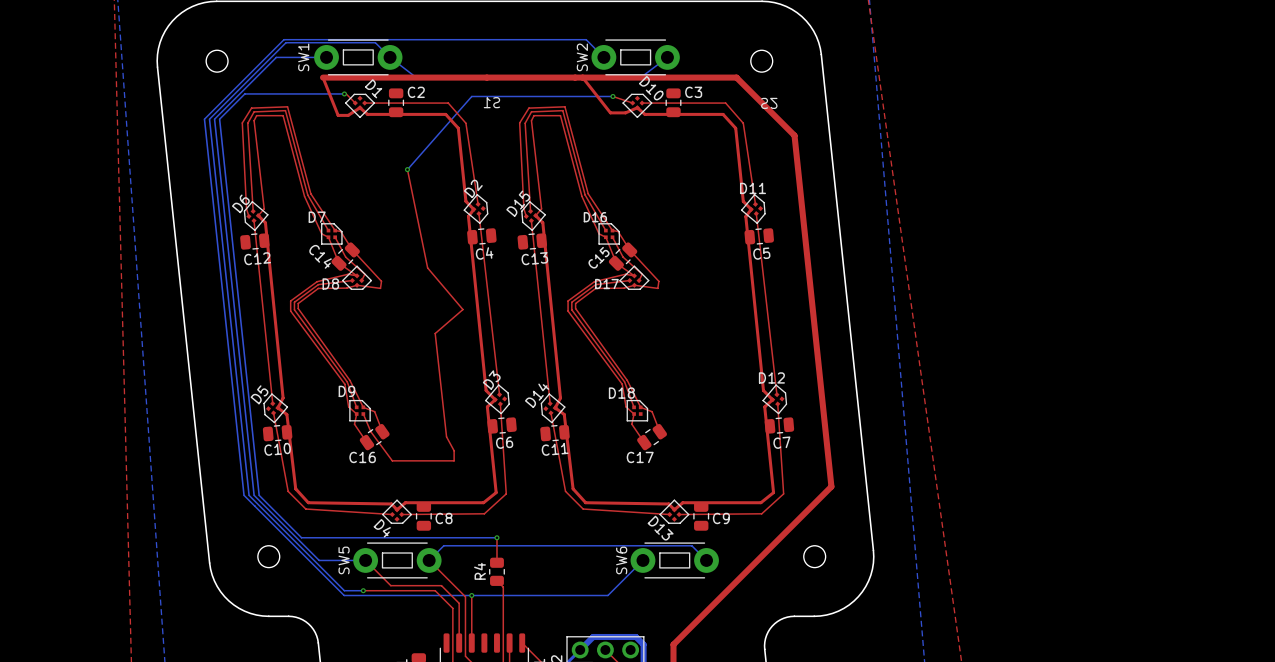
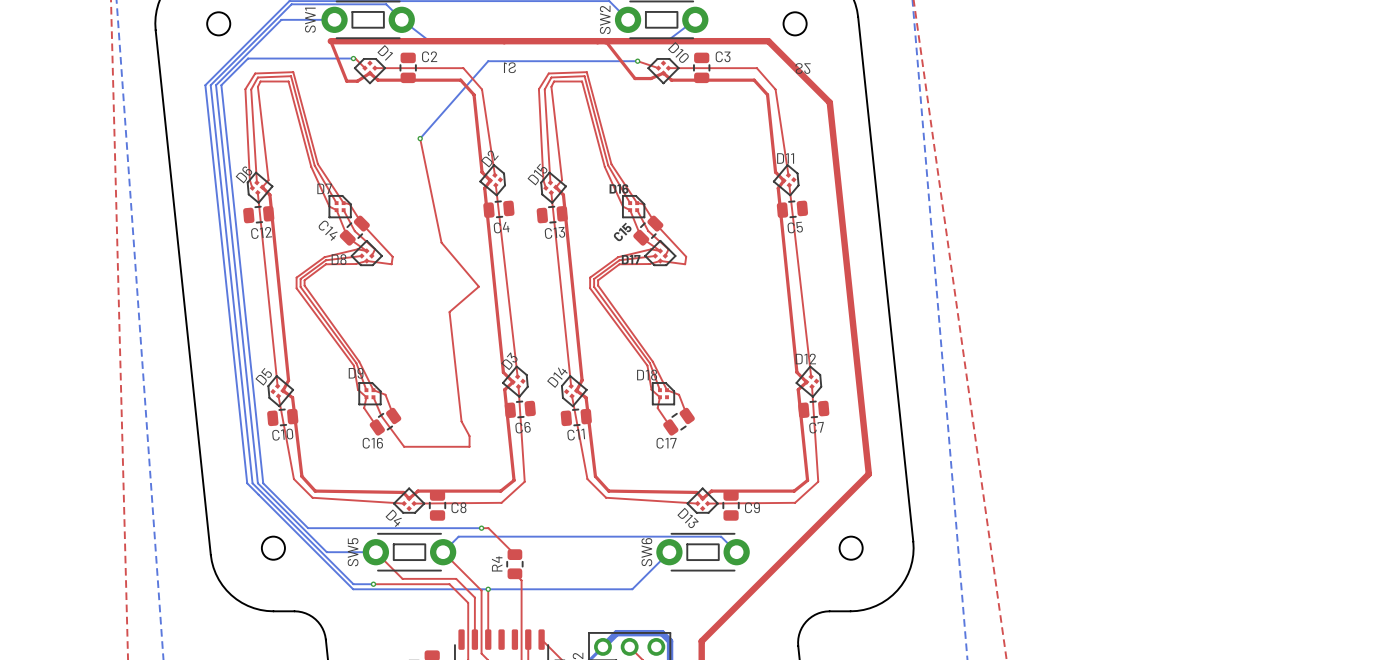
bottom track: (465, 537) (496, 537) -> none
top track: (496, 537) (496, 562) -> (481, 528) (488, 528) (514, 554)
via position: (496, 537) -> (481, 528)

